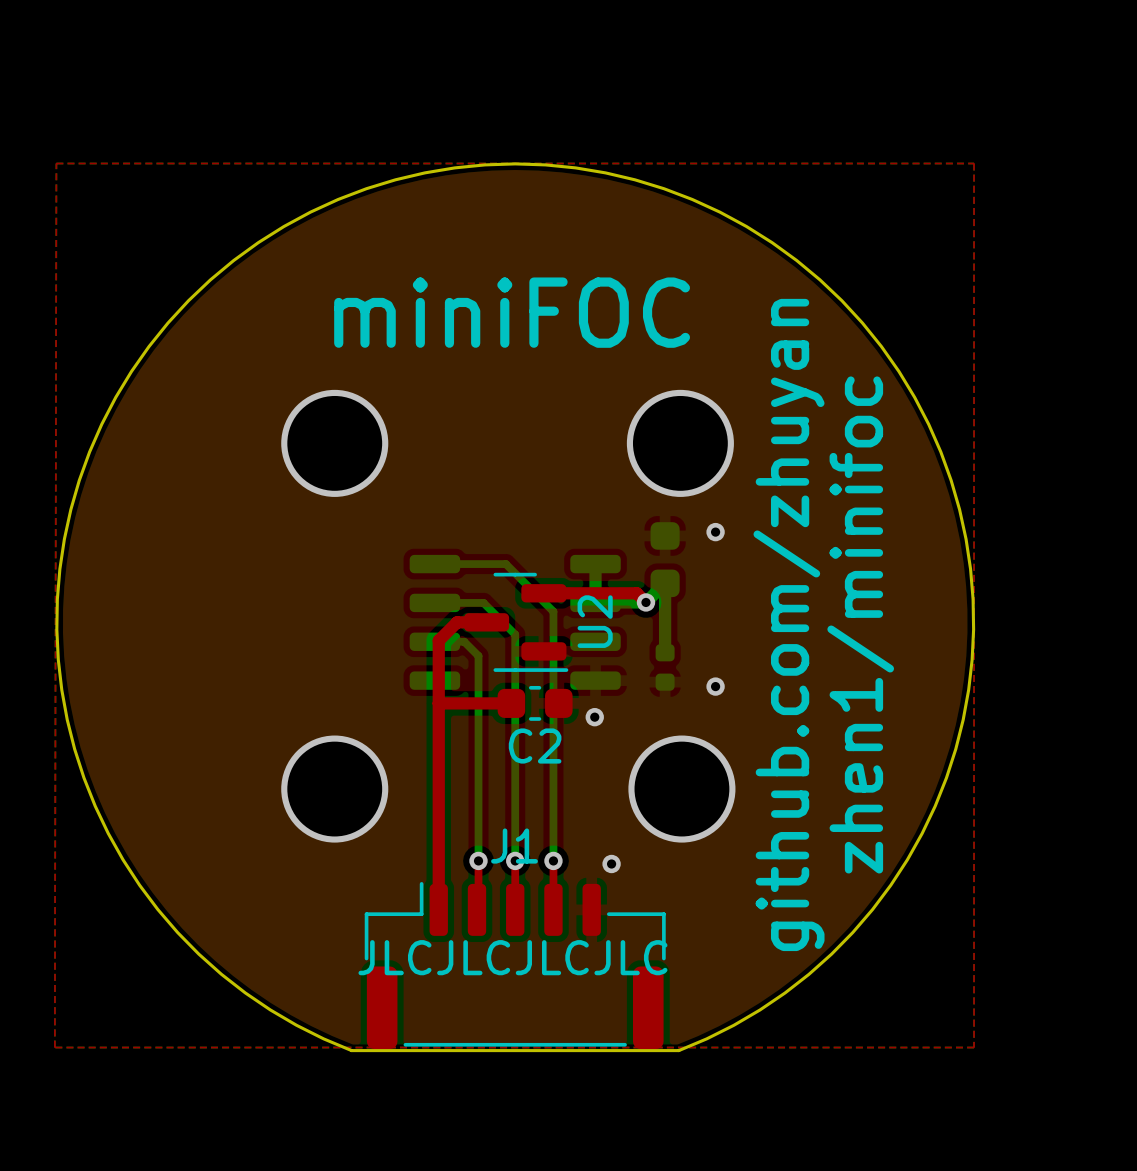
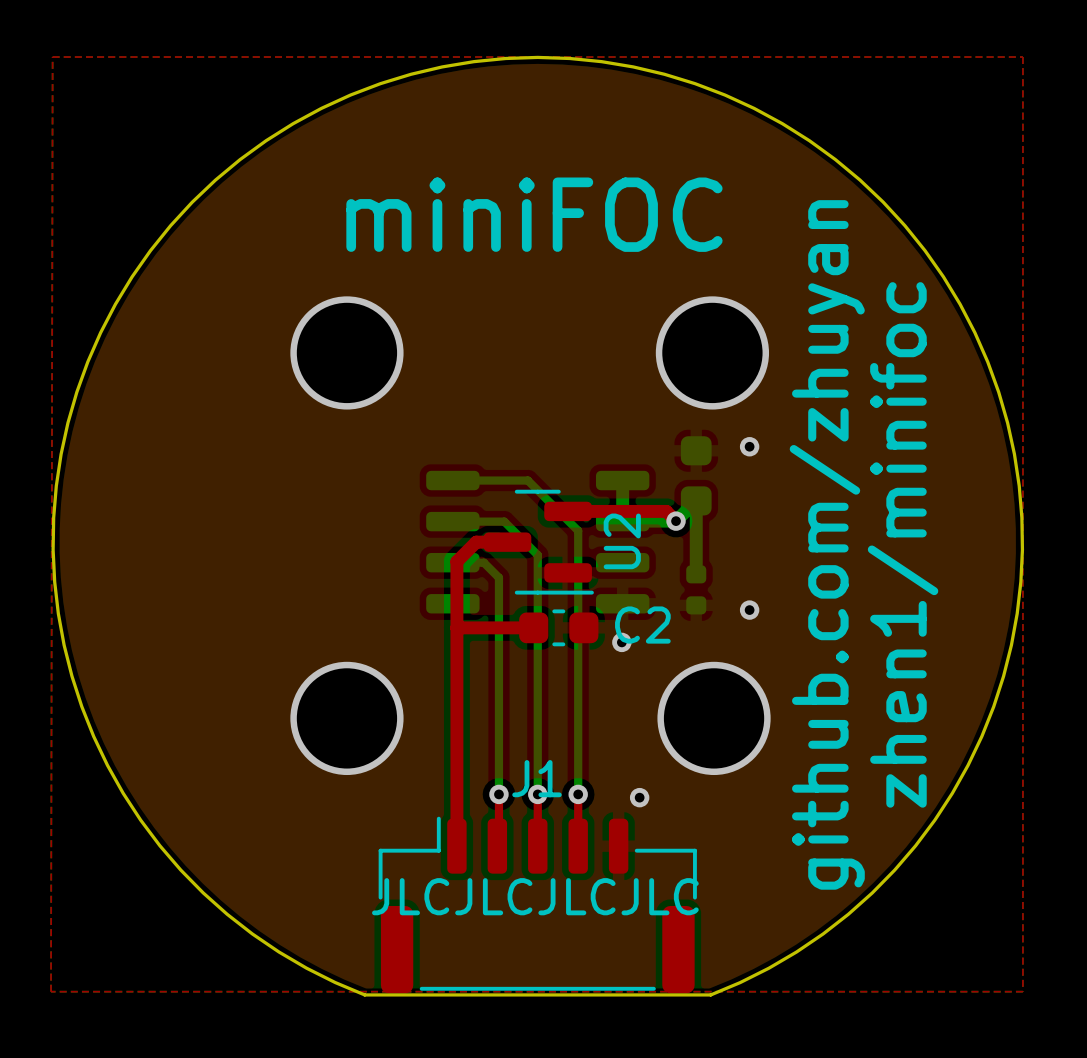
C2 name position: C2 (535, 746) -> C2 (642, 625)

